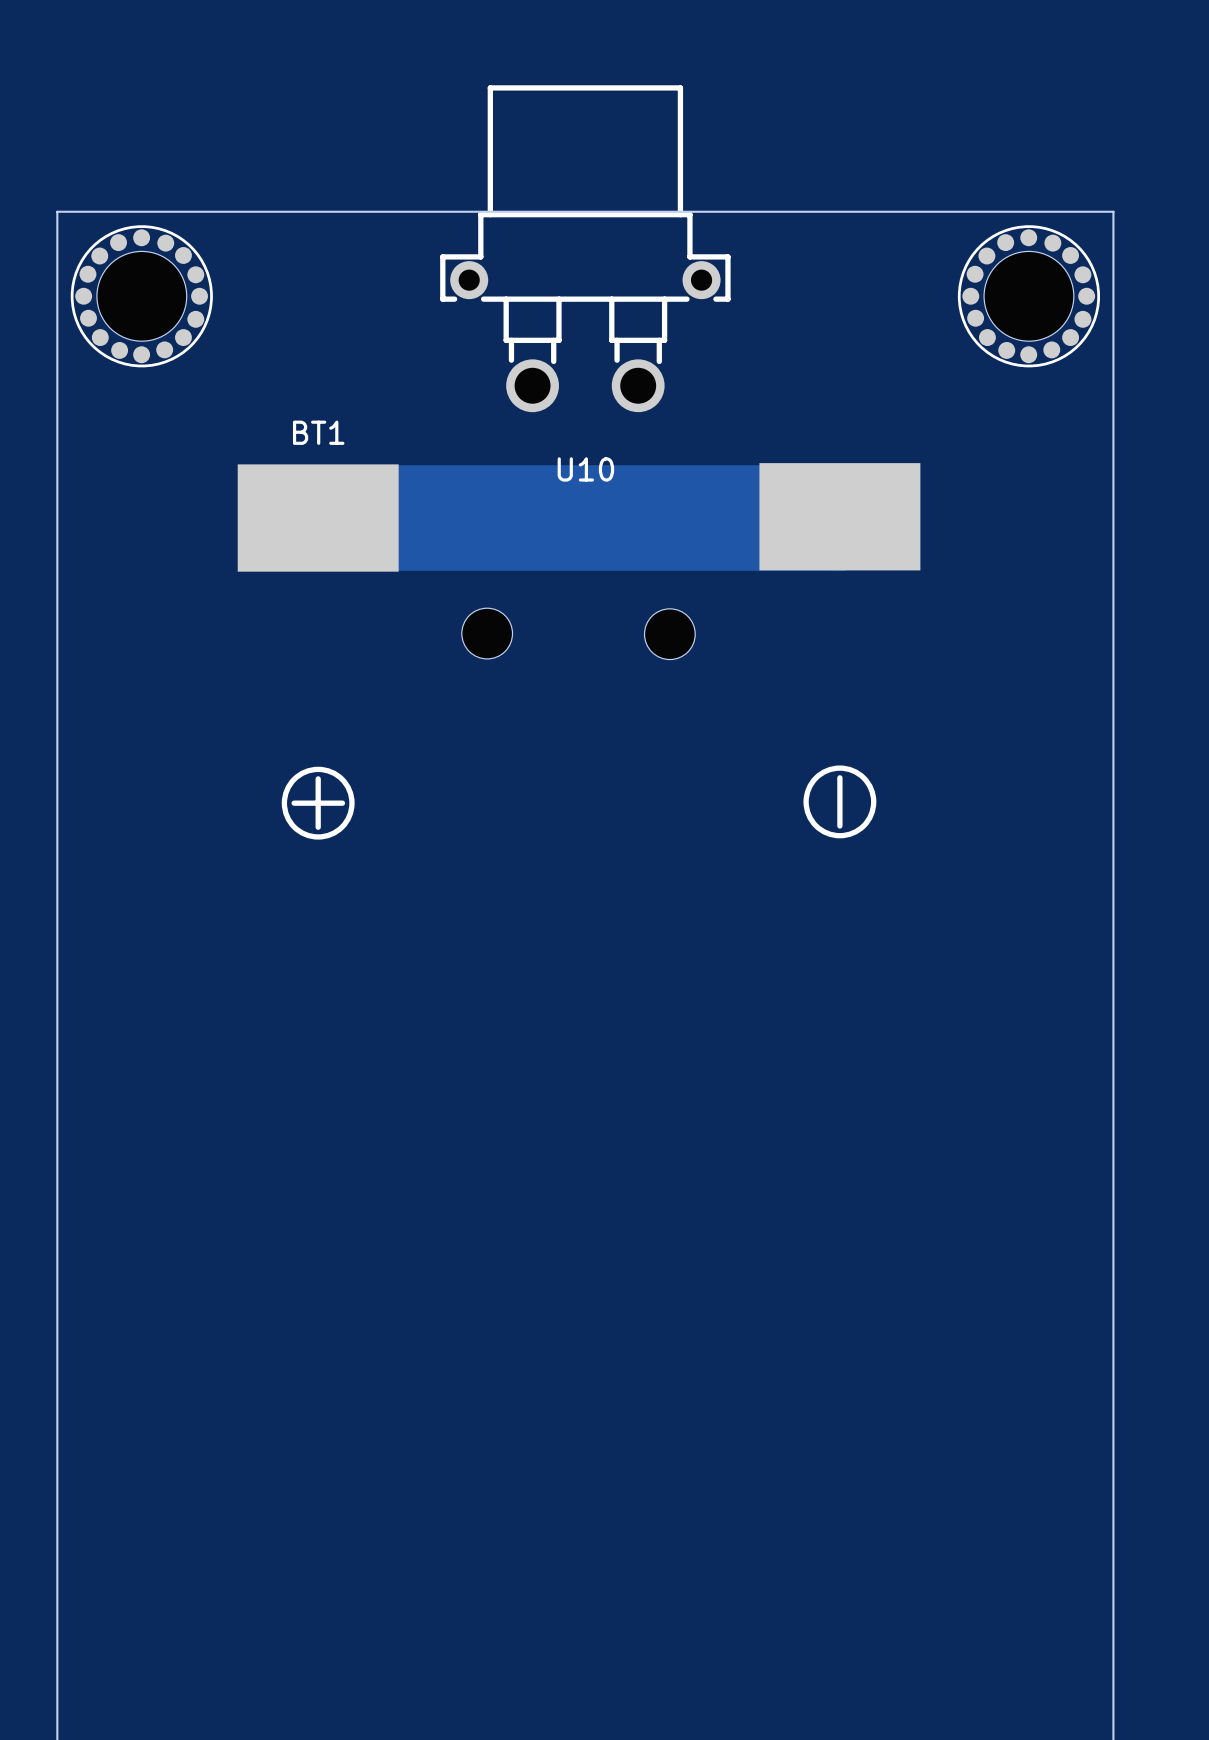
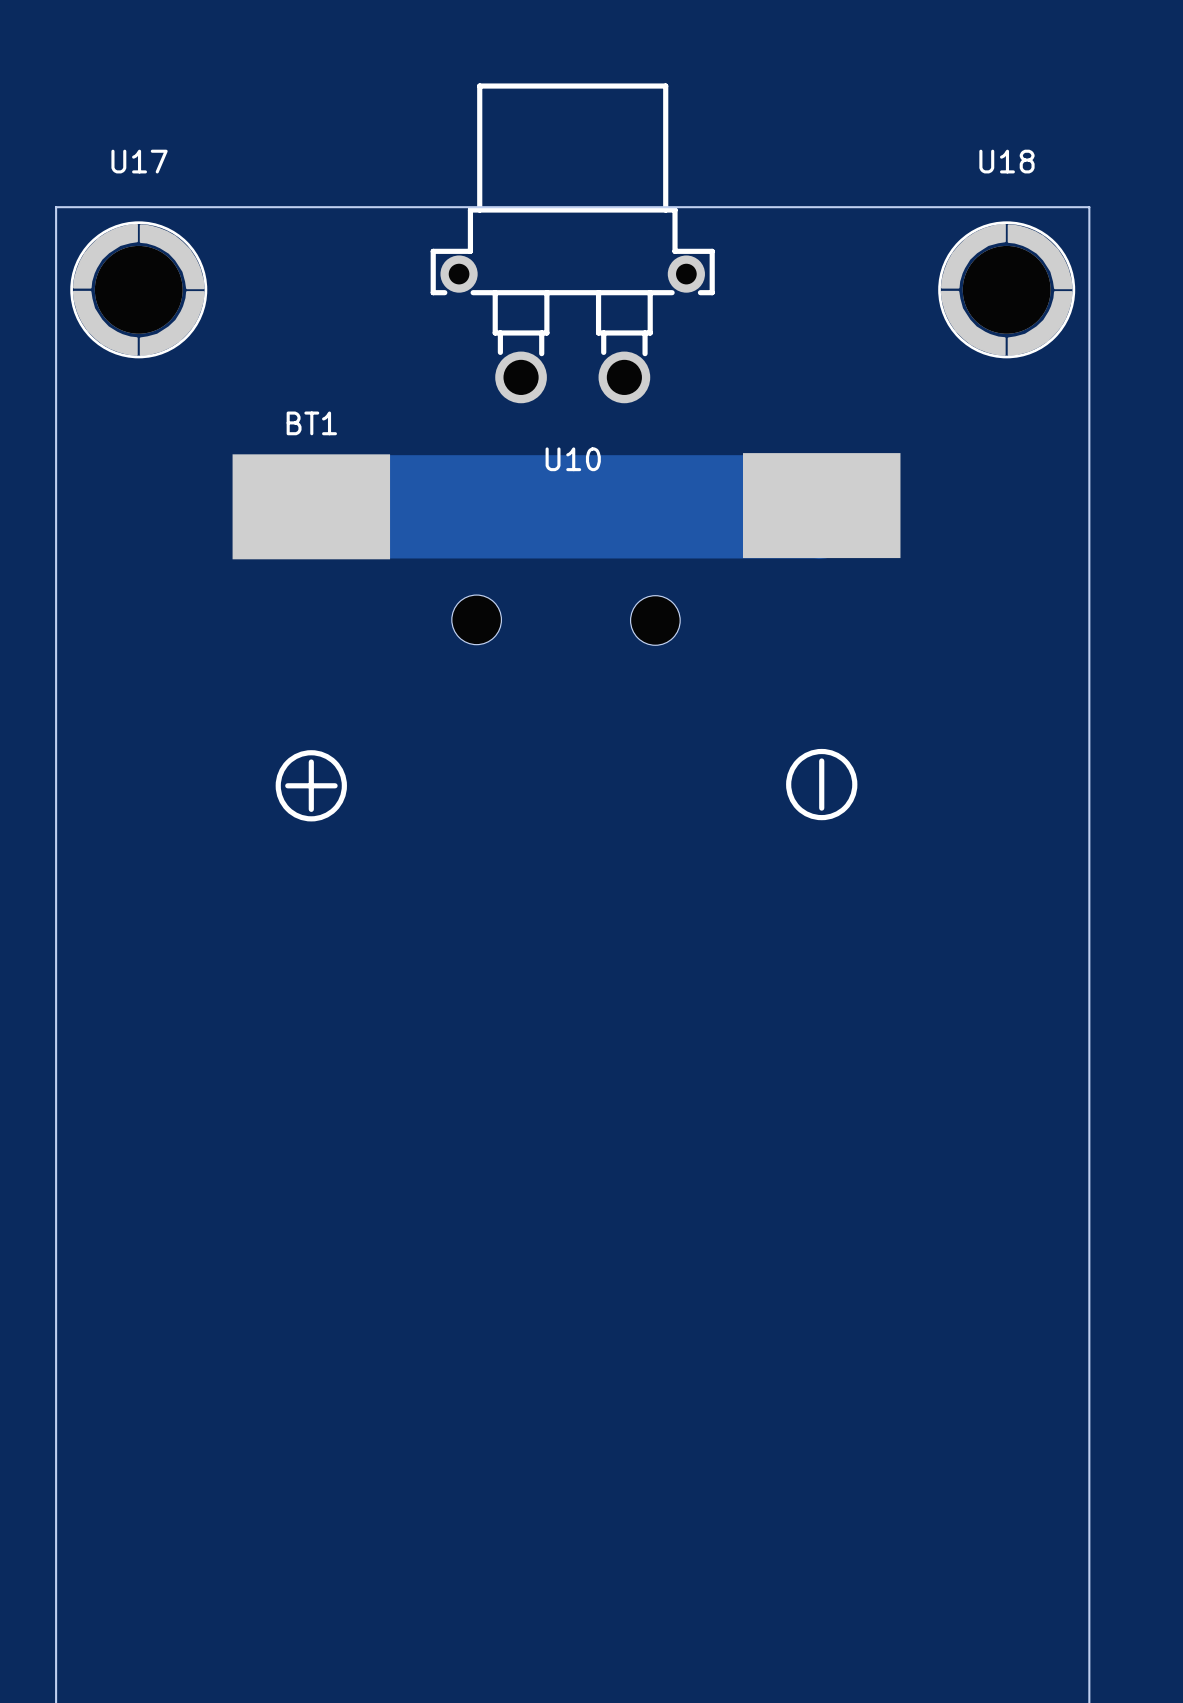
part: (141, 296) -> none
U17: none -> (138, 289)
part: (1028, 296) -> none
U18: none -> (1006, 289)

